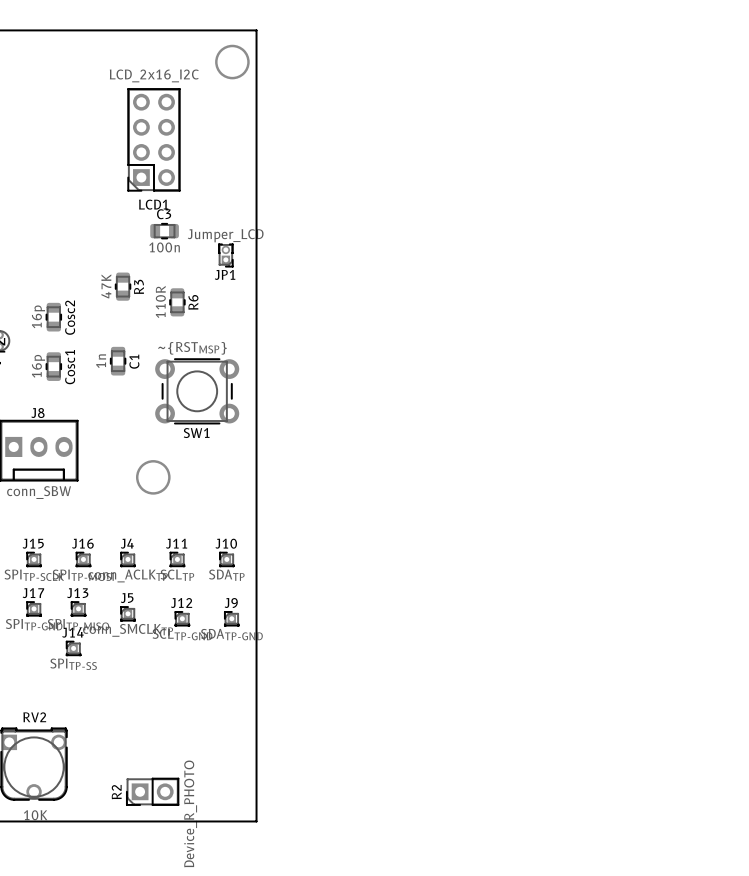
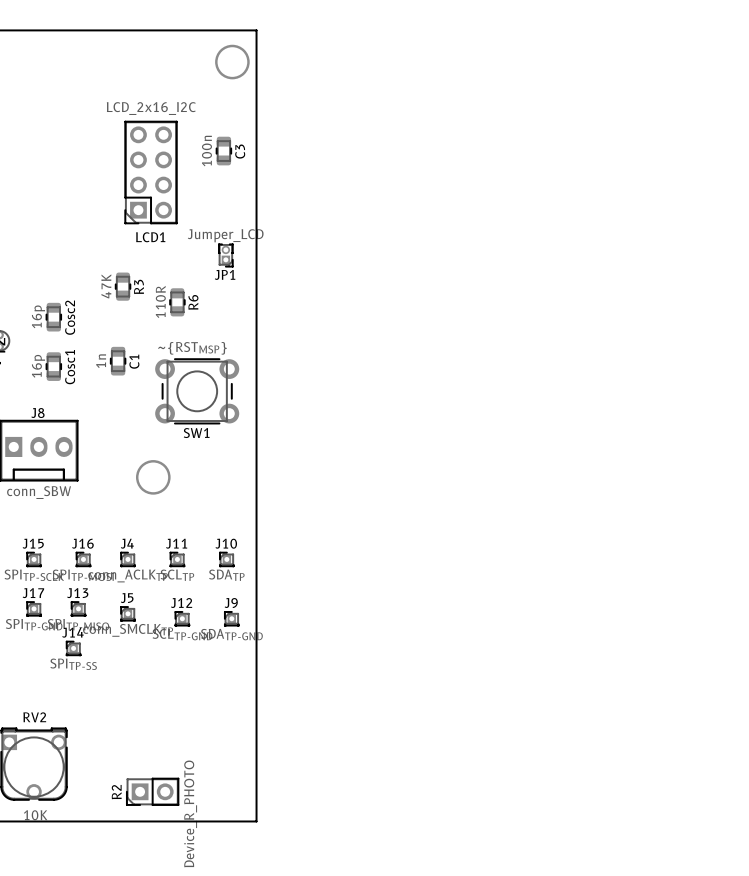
LCD1 position: (153, 139) -> (151, 172)
C3 rotation: 0° (164, 231) -> 90° clockwise (223, 151)
C3 position: (164, 231) -> (223, 151)

